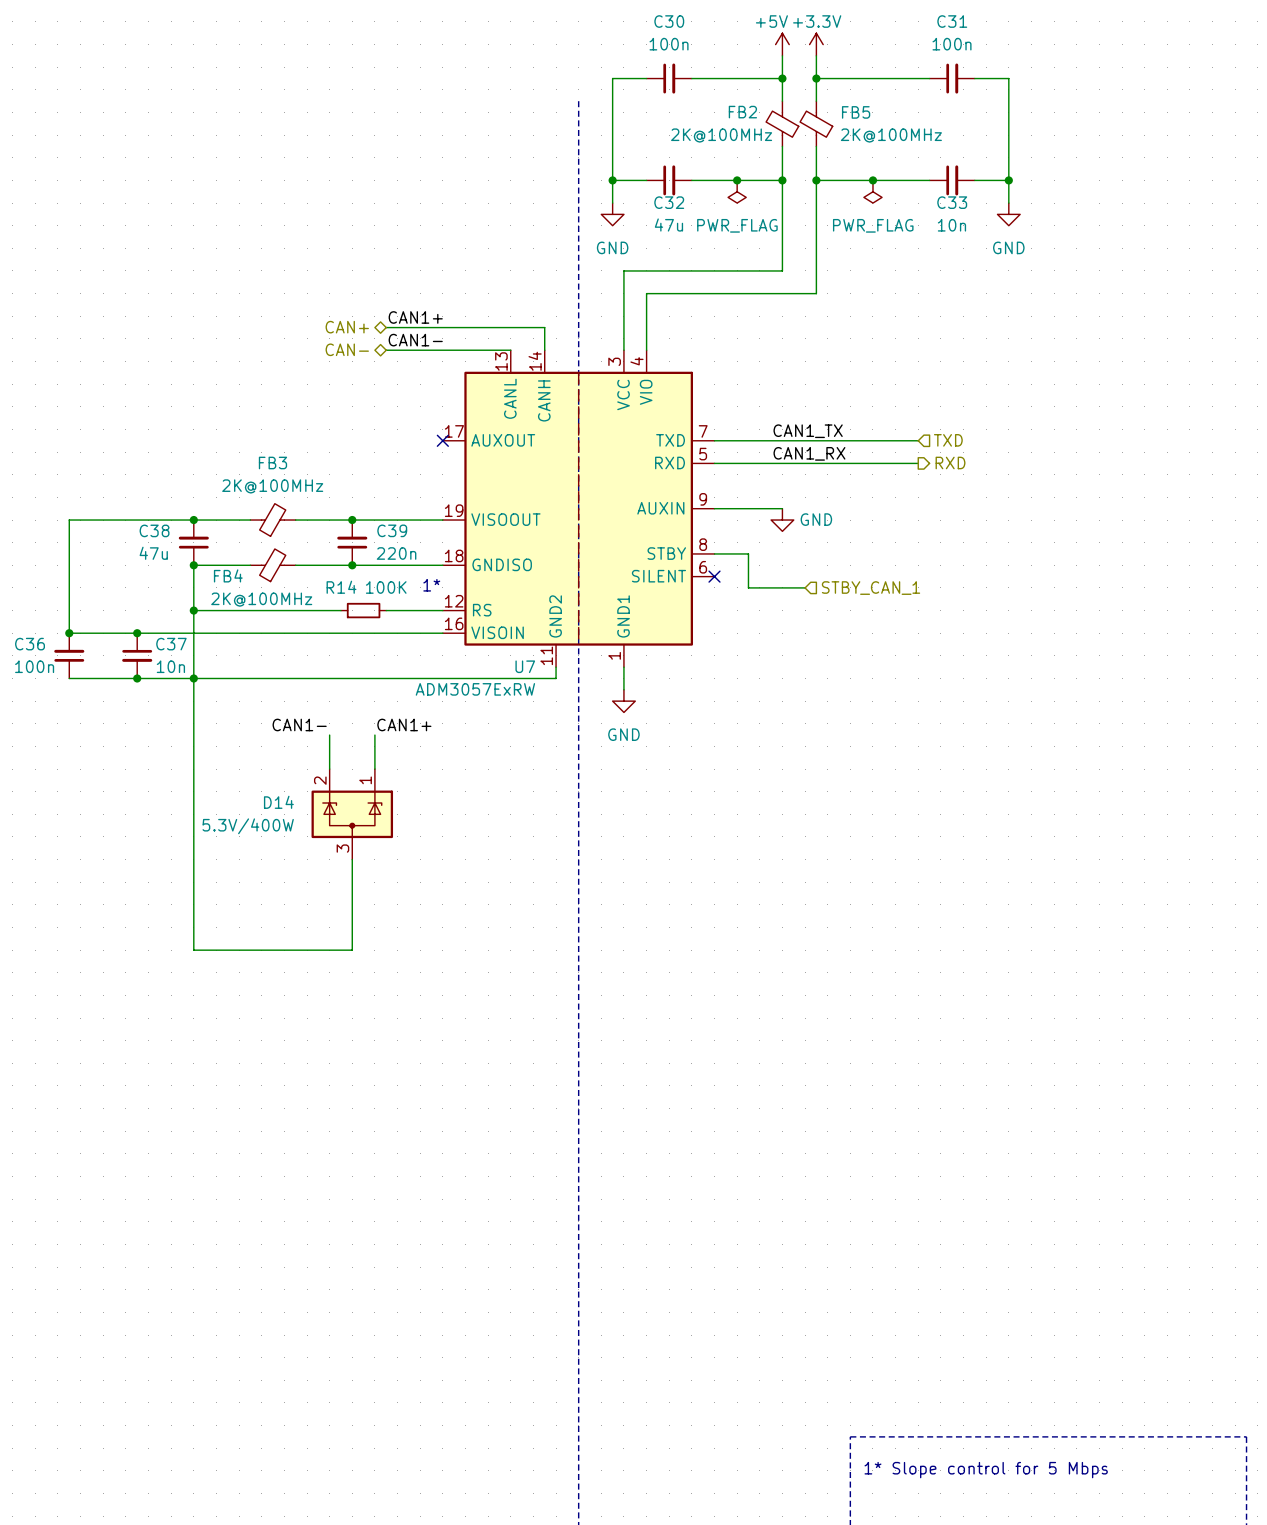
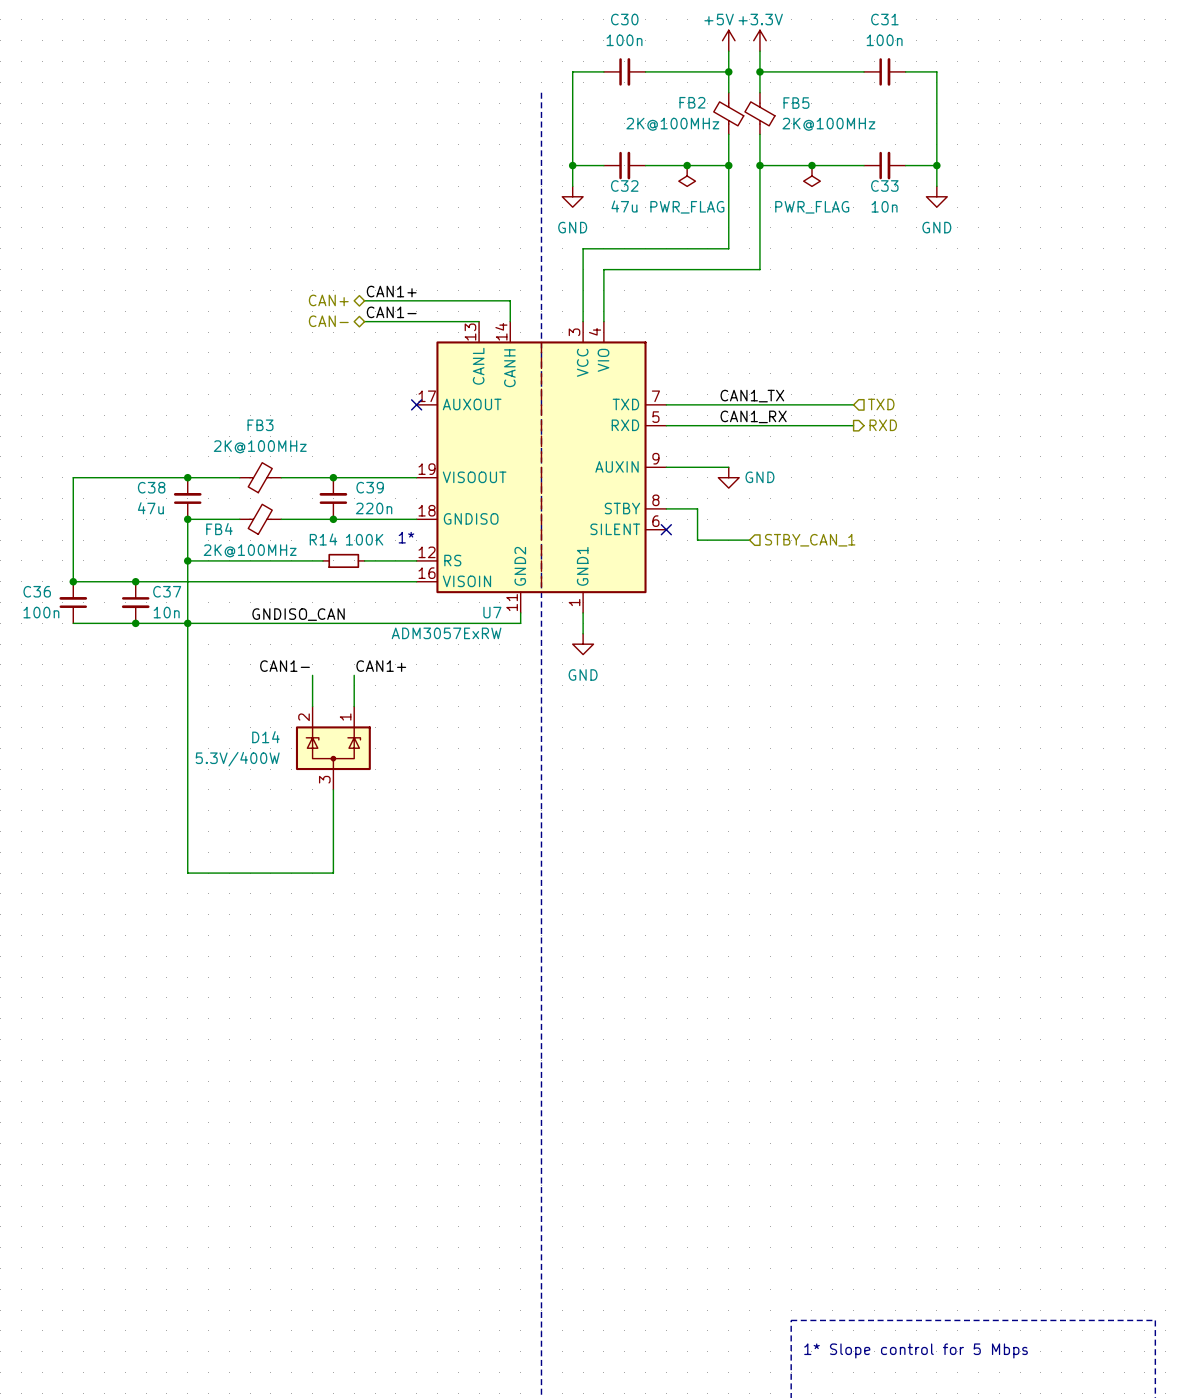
label: none -> GNDISO_CAN (298, 614)

